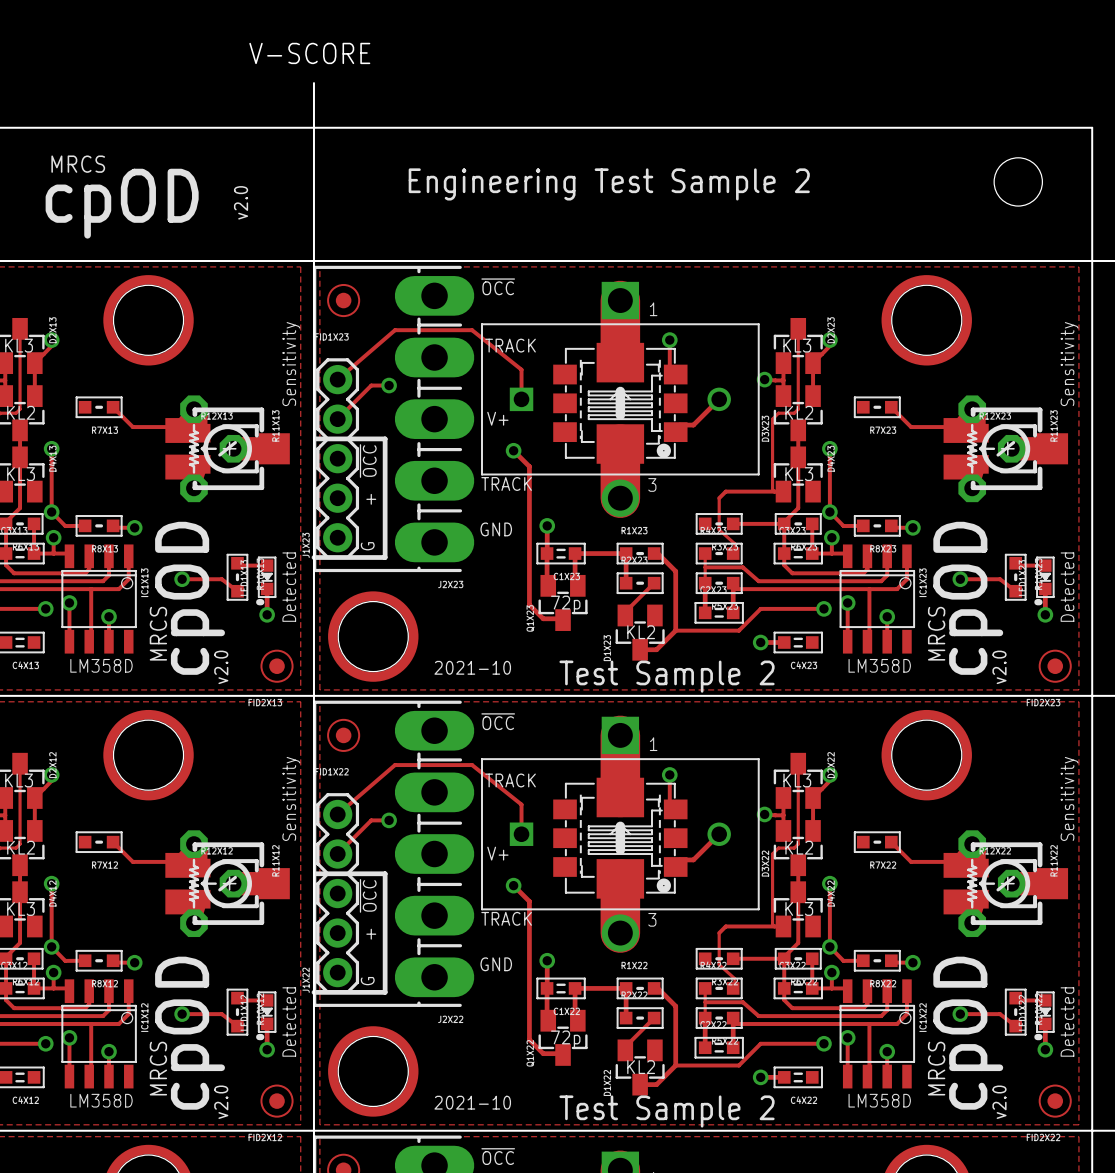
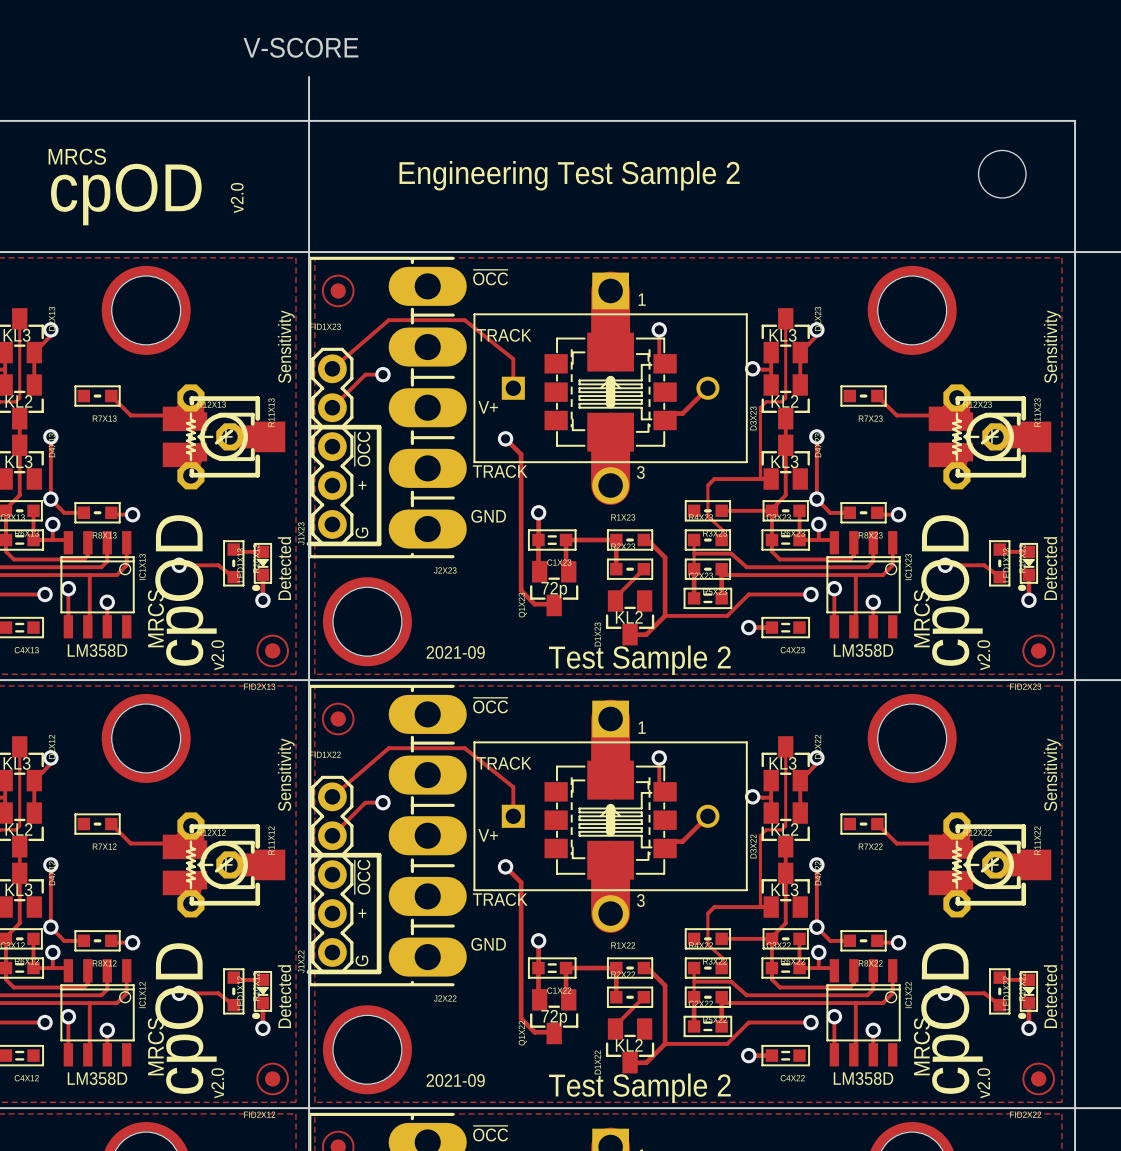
part footprint: [553, 342, 688, 464] -> [544, 332, 677, 452]
text: 2021-10 (472, 667) -> 2021-09 (455, 652)
part footprint: [553, 777, 688, 899] -> [544, 760, 677, 880]
text: 2021-10 (472, 1102) -> 2021-09 (455, 1080)

